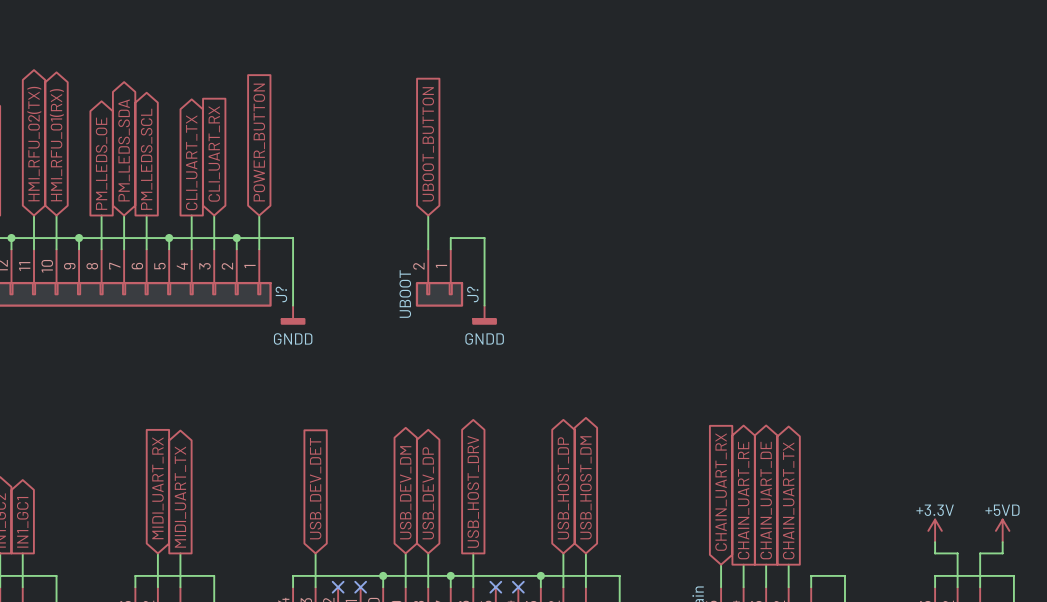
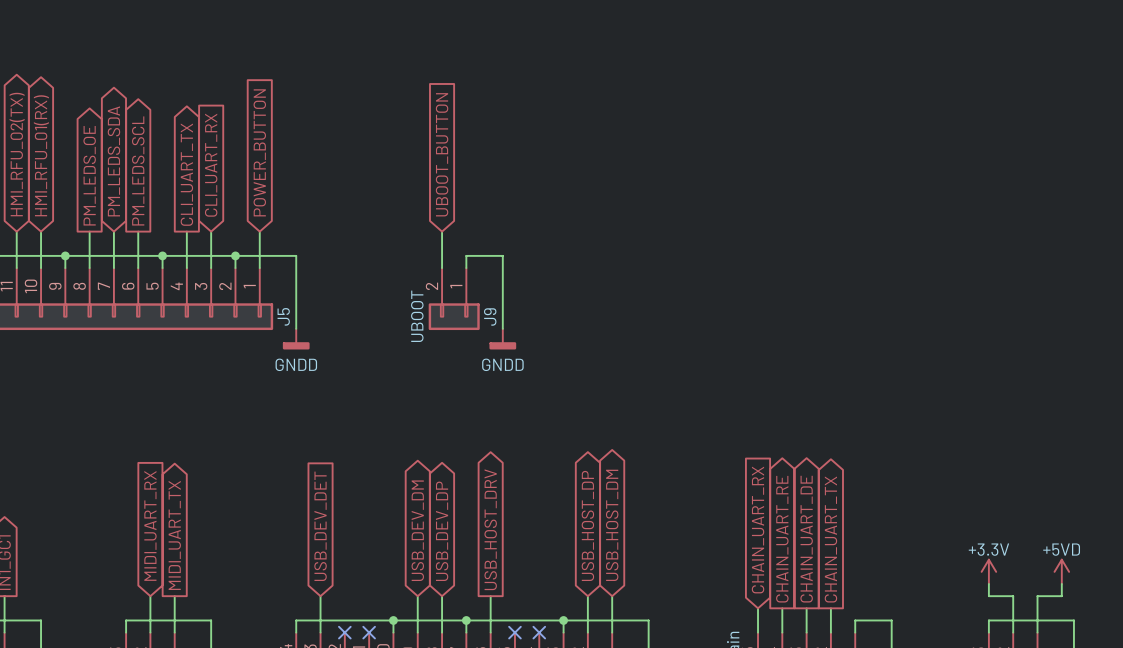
J? name: J? (281, 294) -> J5 (283, 316)
J? name: J? (472, 294) -> J9 (490, 316)

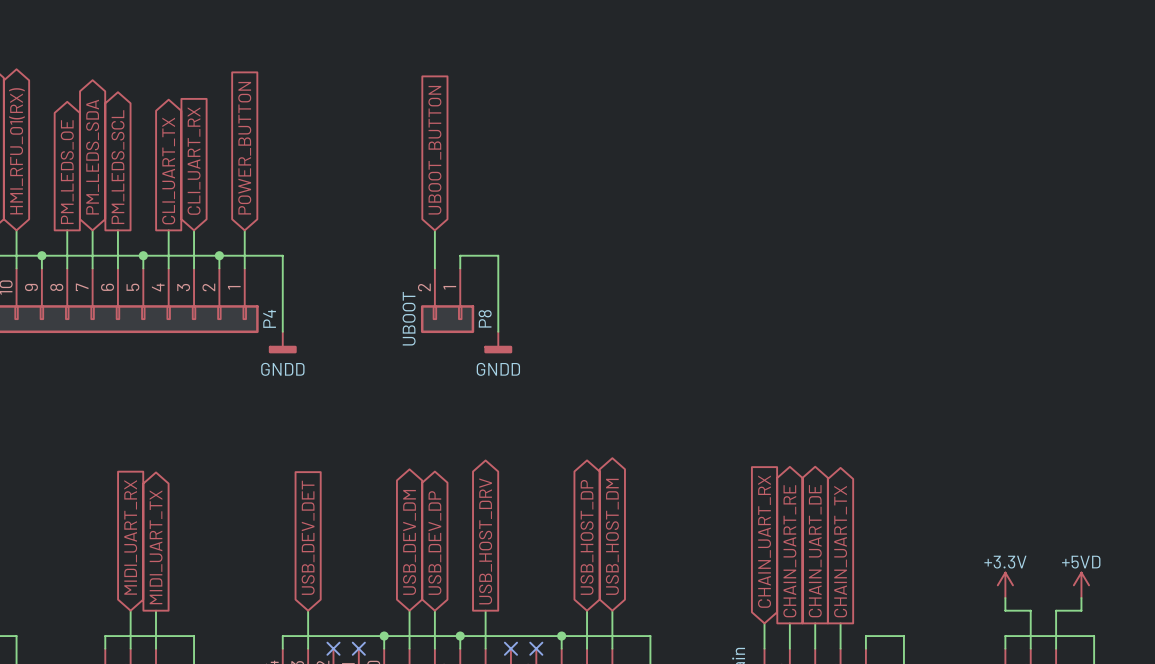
J5 name: J5 (283, 316) -> P4 (269, 318)
J9 name: J9 (490, 316) -> P8 (485, 318)

